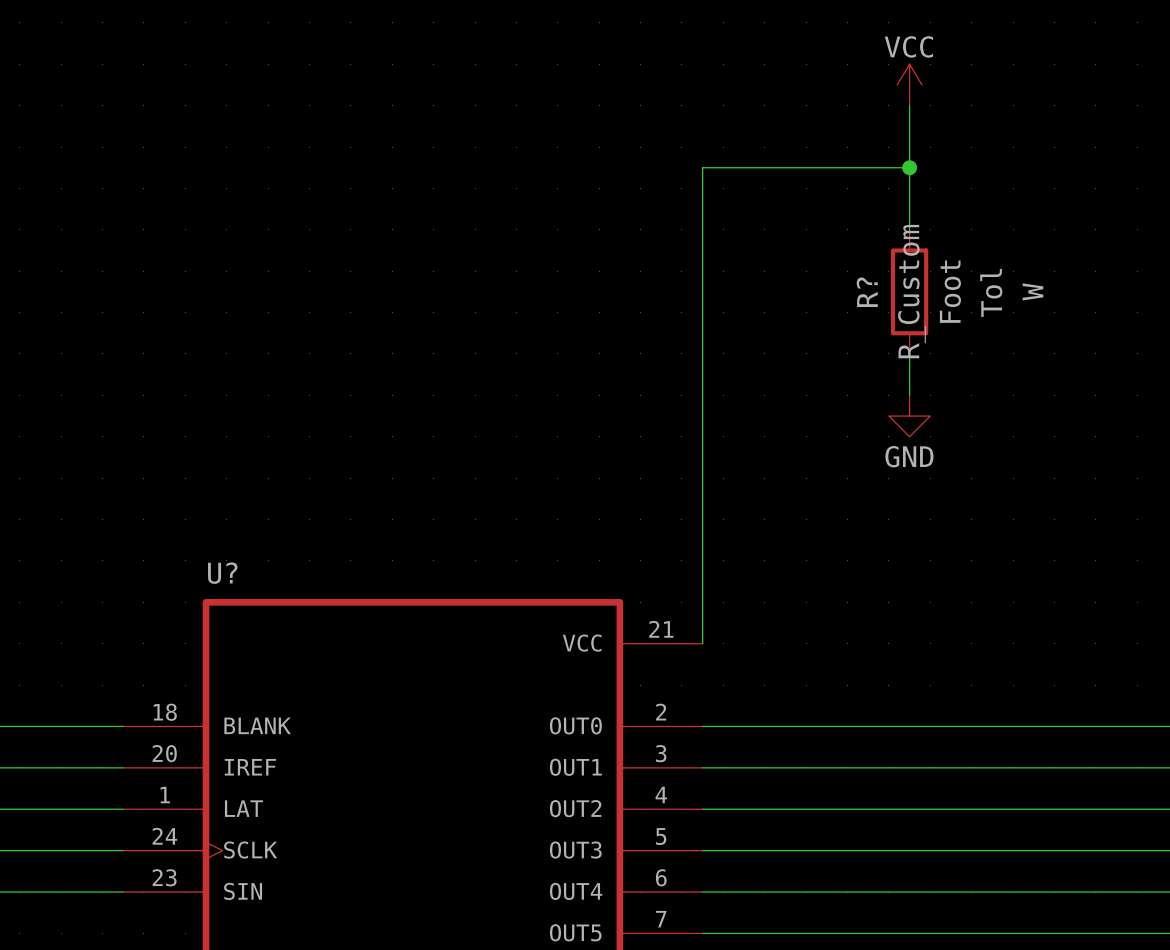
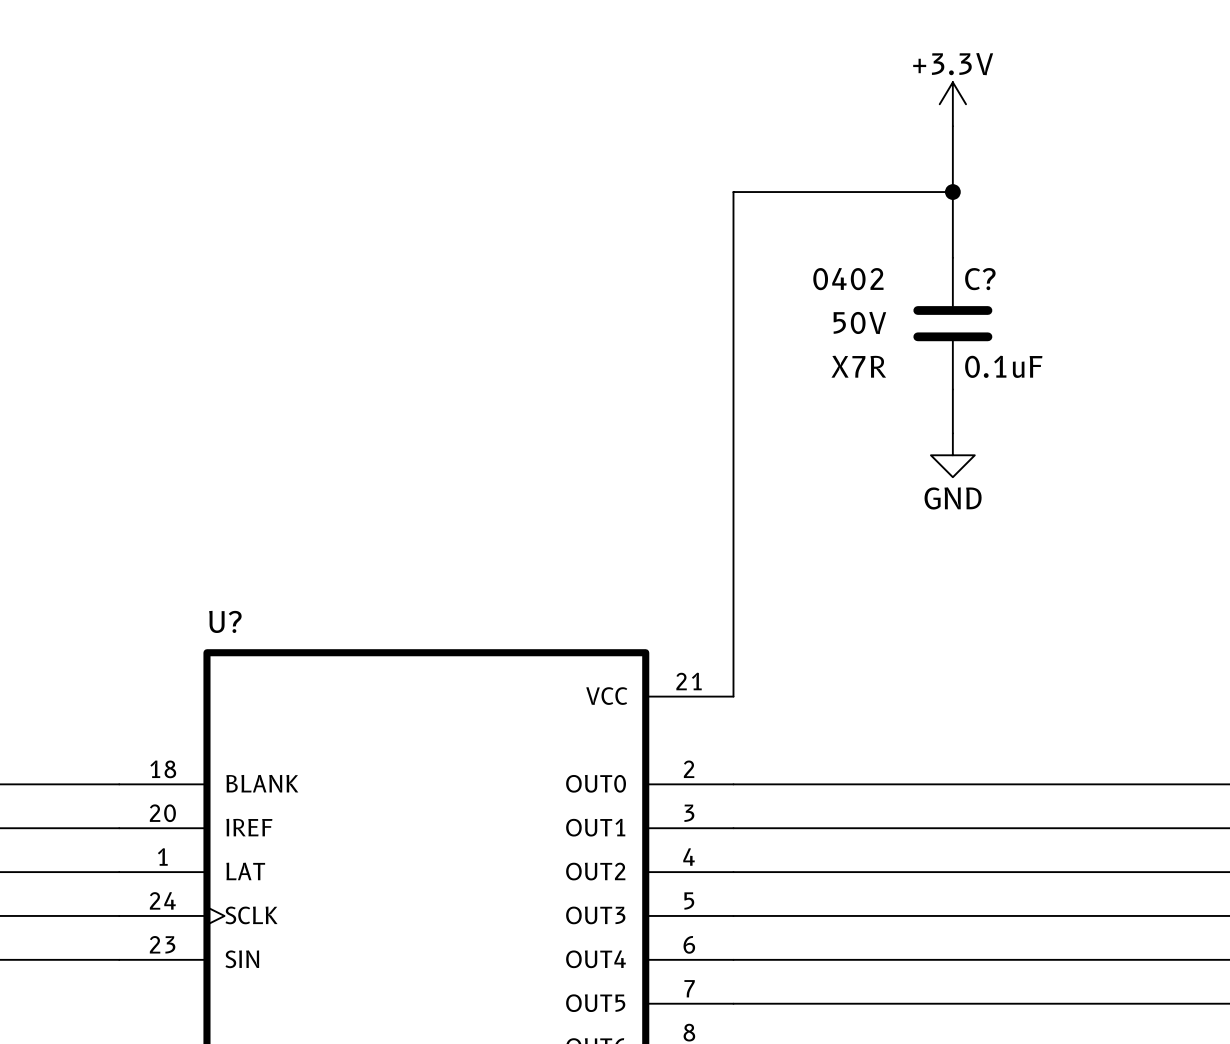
power symbol: VCC (909, 84) -> +3.3V (952, 104)
R?: R_Custom (909, 291) -> none
C?: none -> 0.1uF (952, 323)

